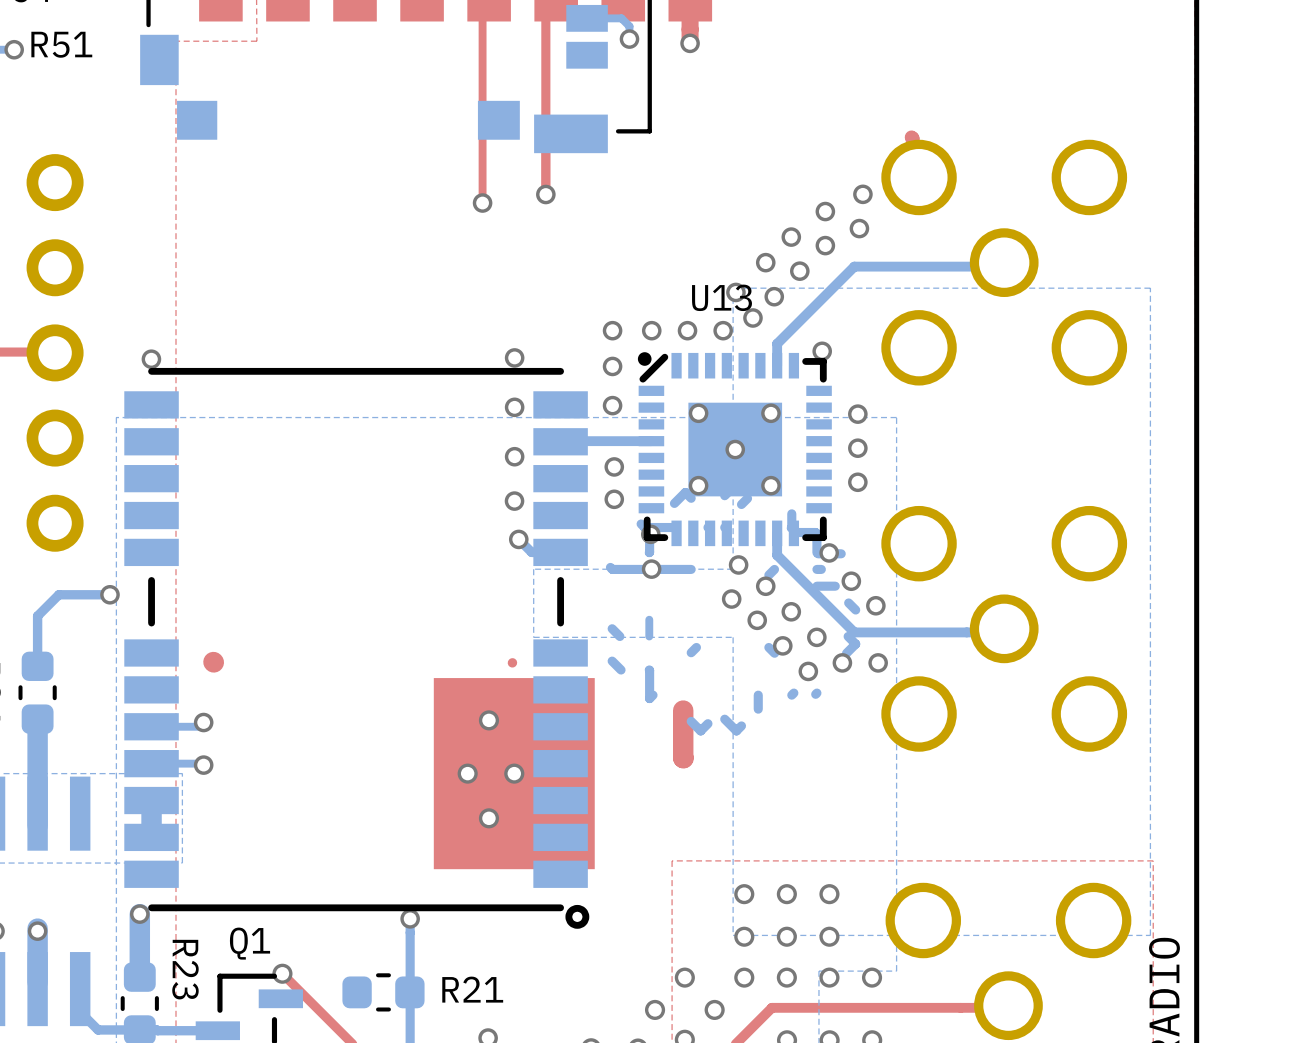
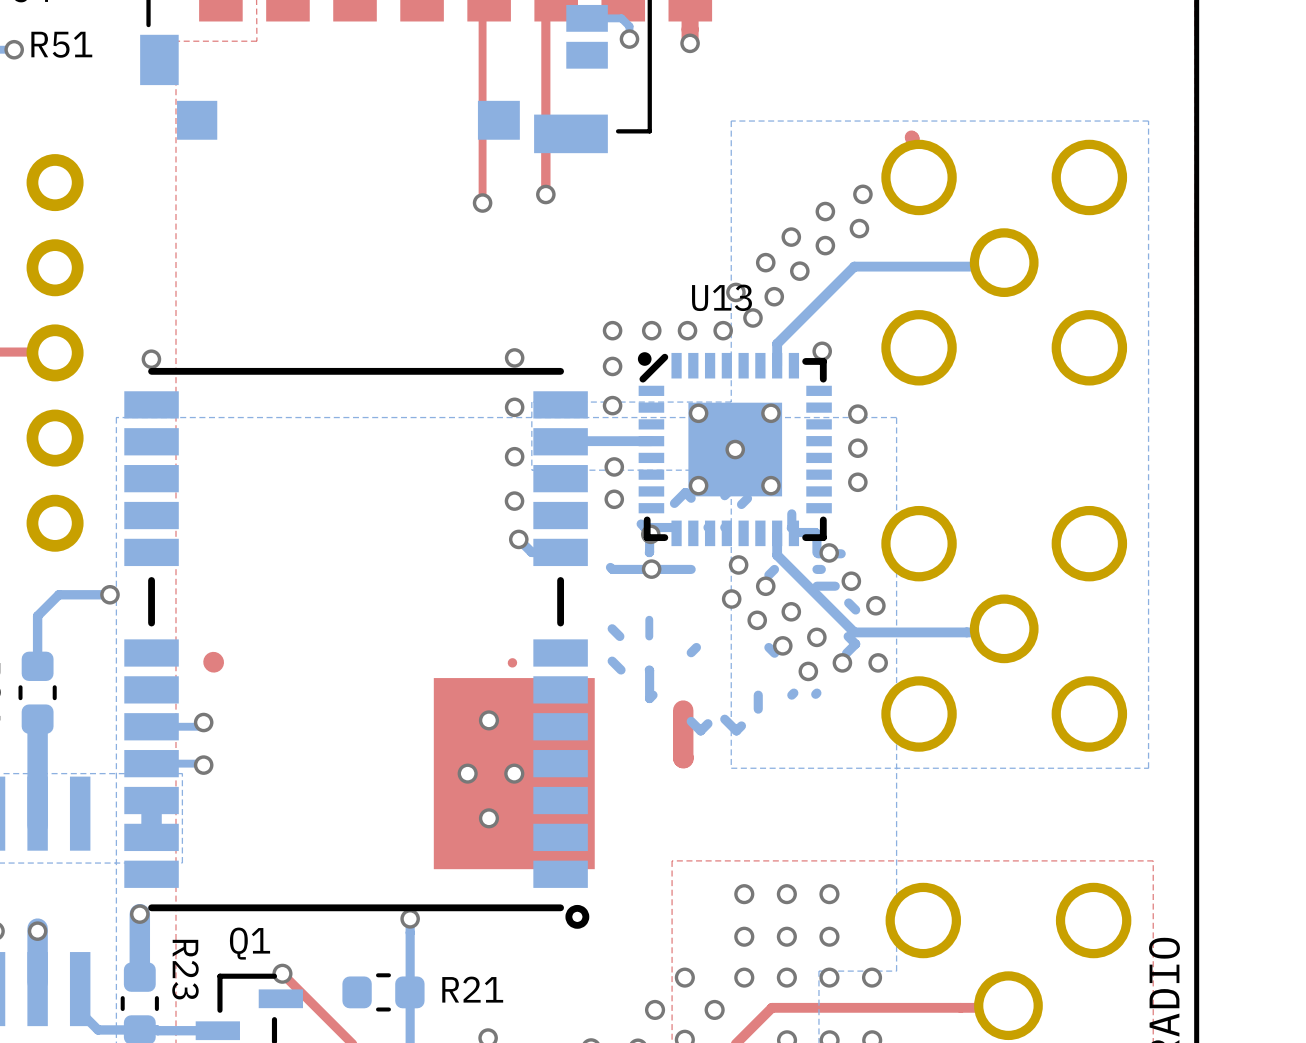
bottom zone outline: (1150, 288) (1150, 935) (733, 935) (733, 637) (533, 637) (533, 569) (733, 569) (733, 288) (1150, 288) -> (1148, 121) (1148, 768) (731, 768) (731, 470) (531, 470) (531, 402) (731, 402) (731, 121) (1148, 121)

